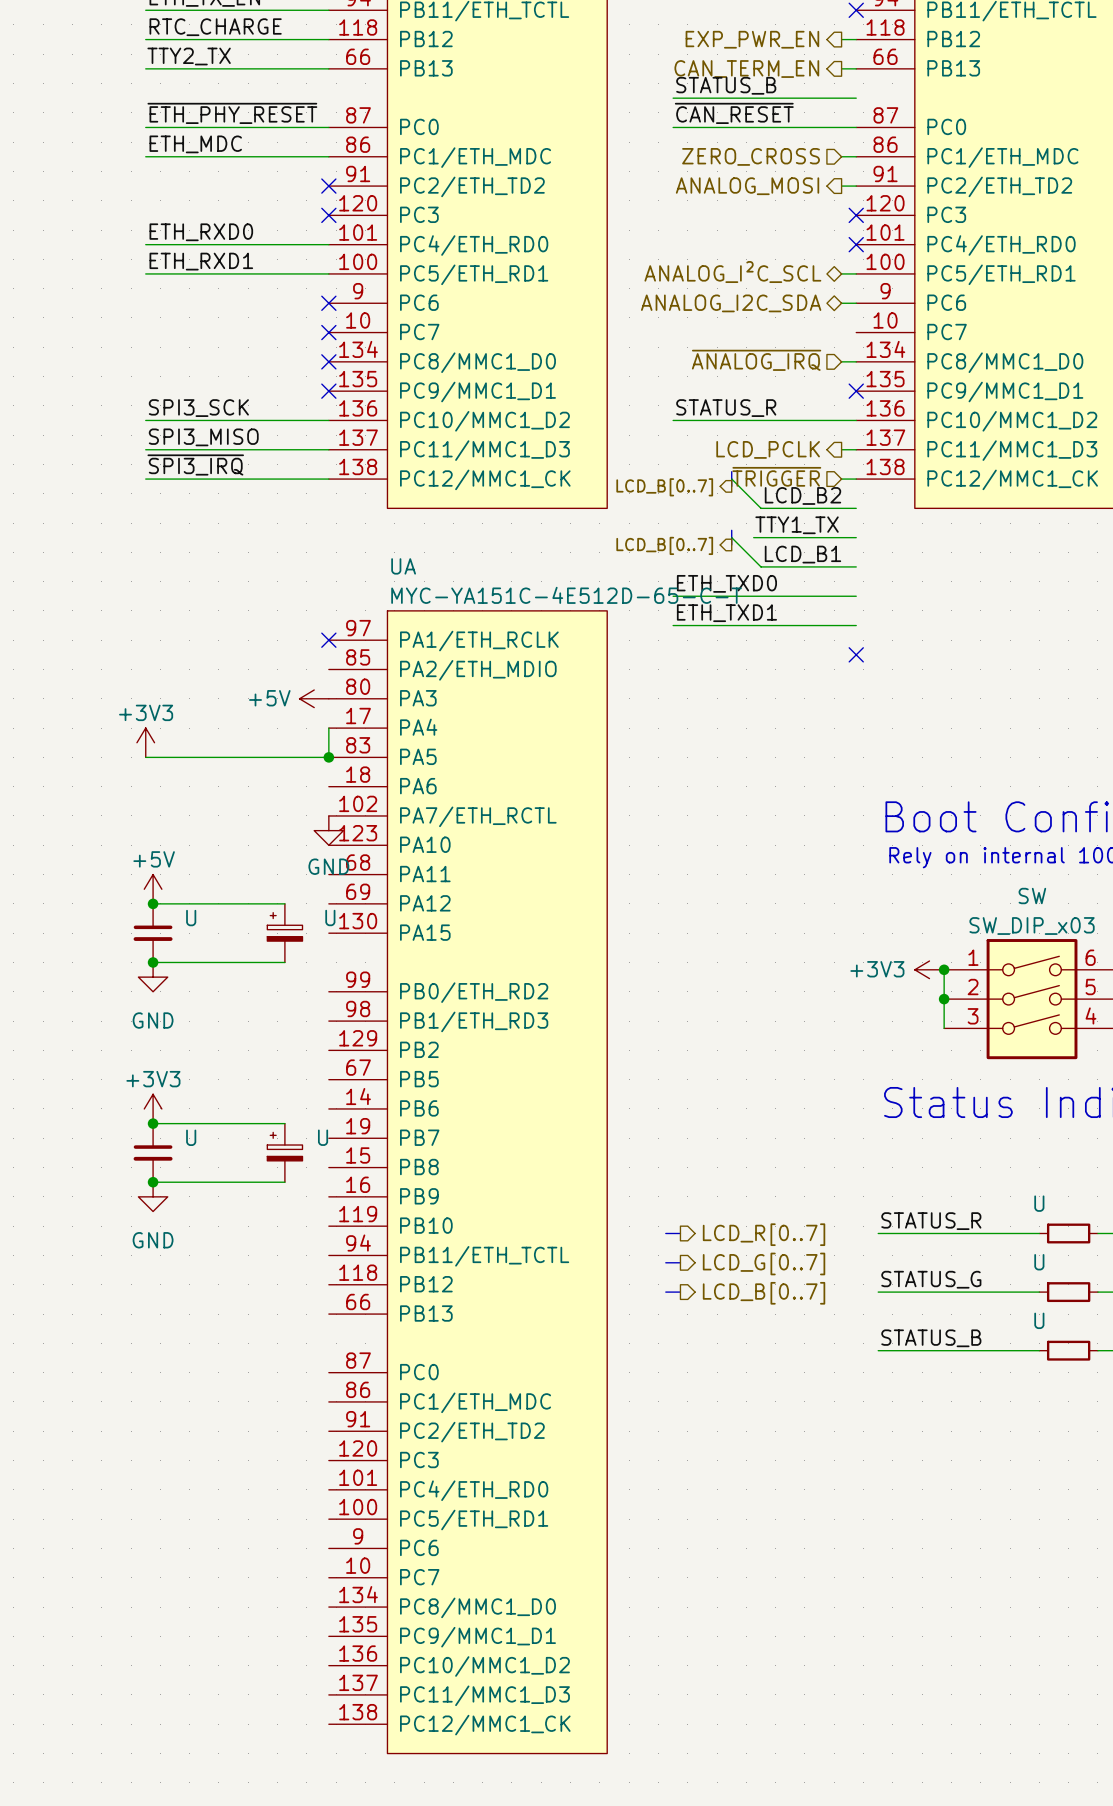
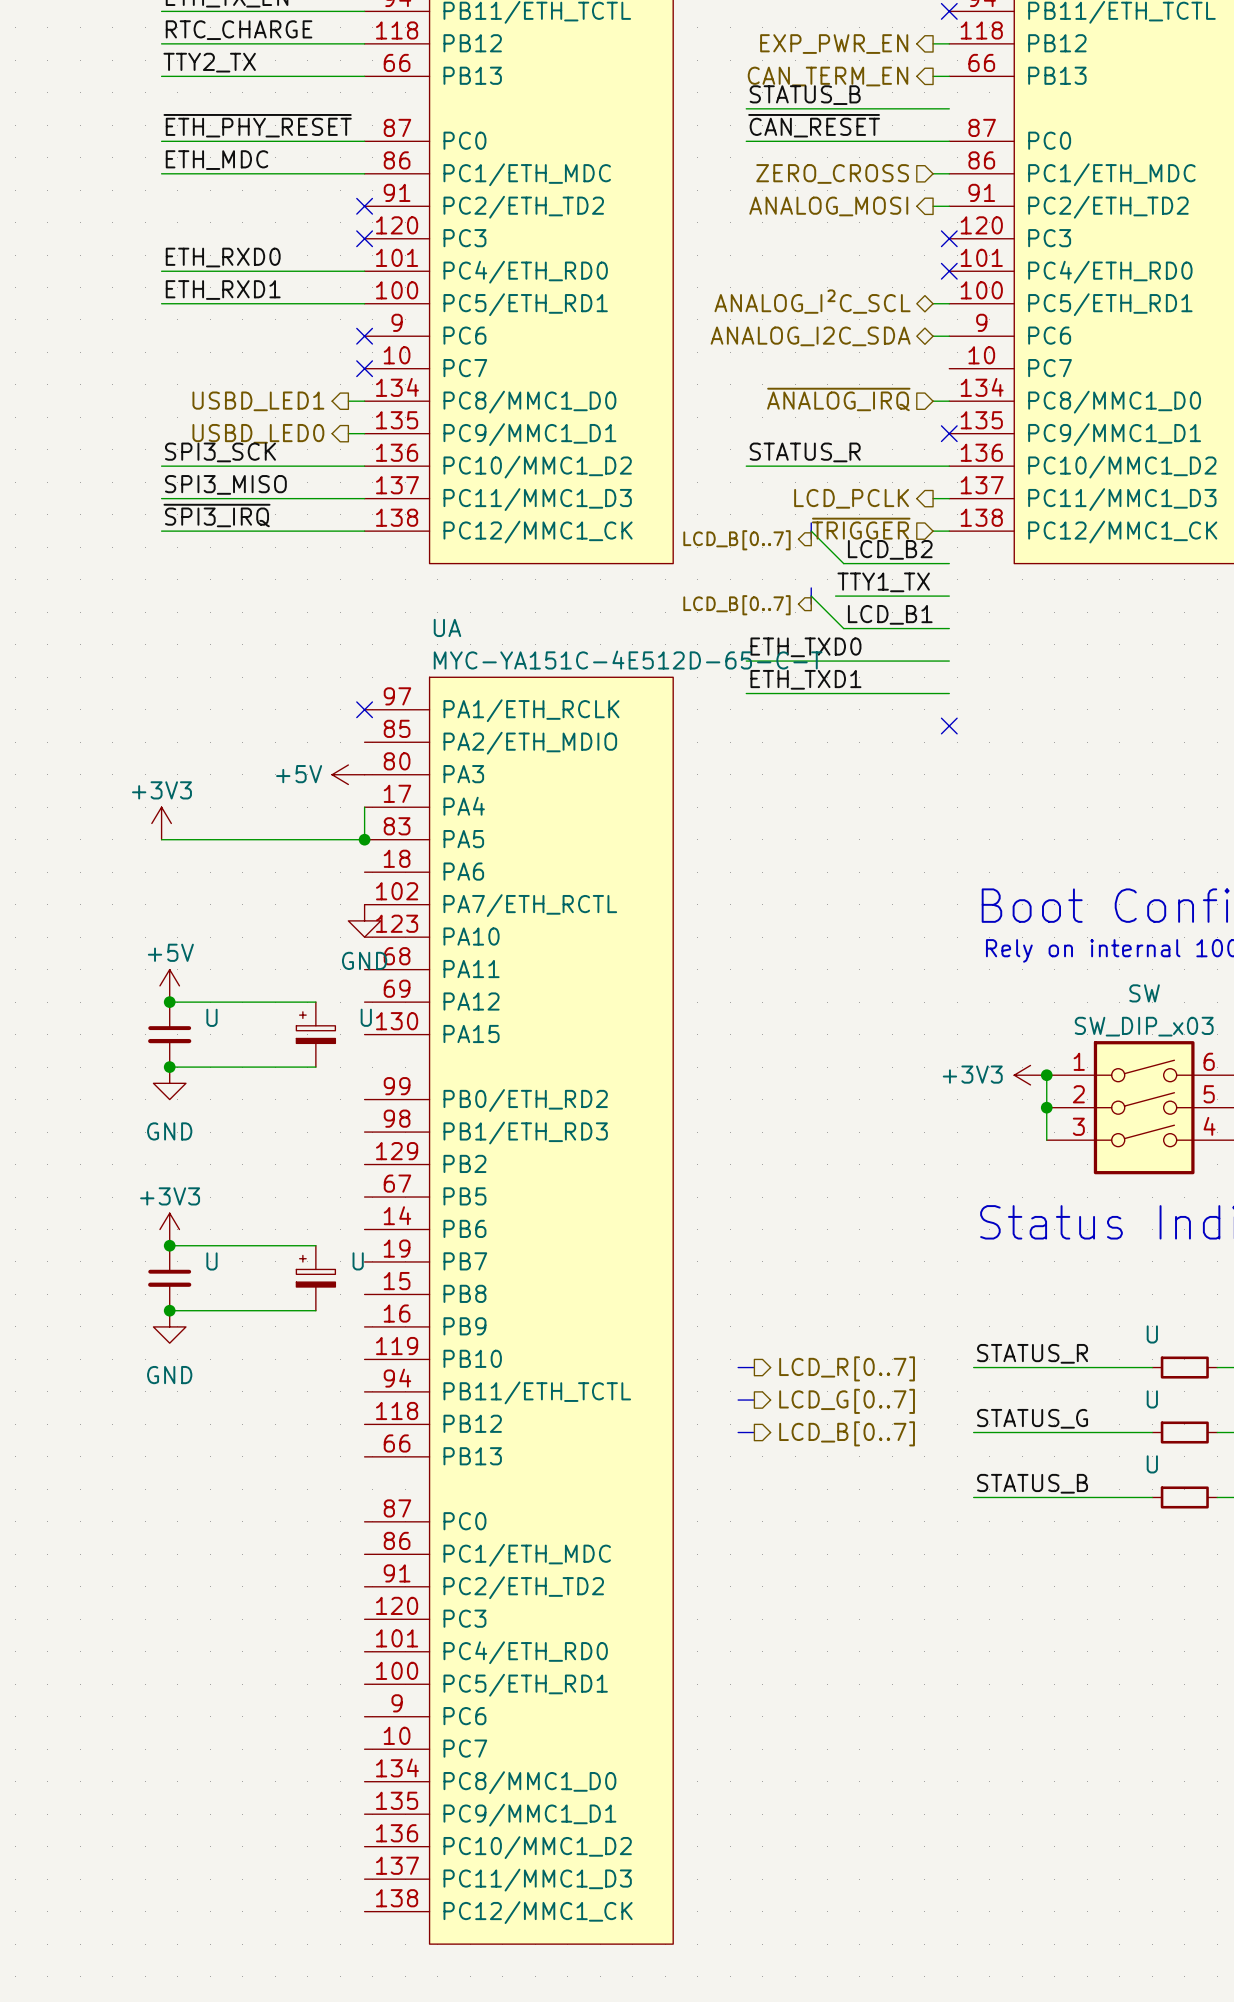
wire: none -> (348, 401) (364, 401)
no-connect mark: (328, 361) -> none
hierarchical label: none -> USBD_LED1 (258, 401)
hierarchical label: none -> USBD_LED0 (258, 433)
wire: none -> (348, 433) (364, 433)
no-connect mark: (328, 391) -> none

